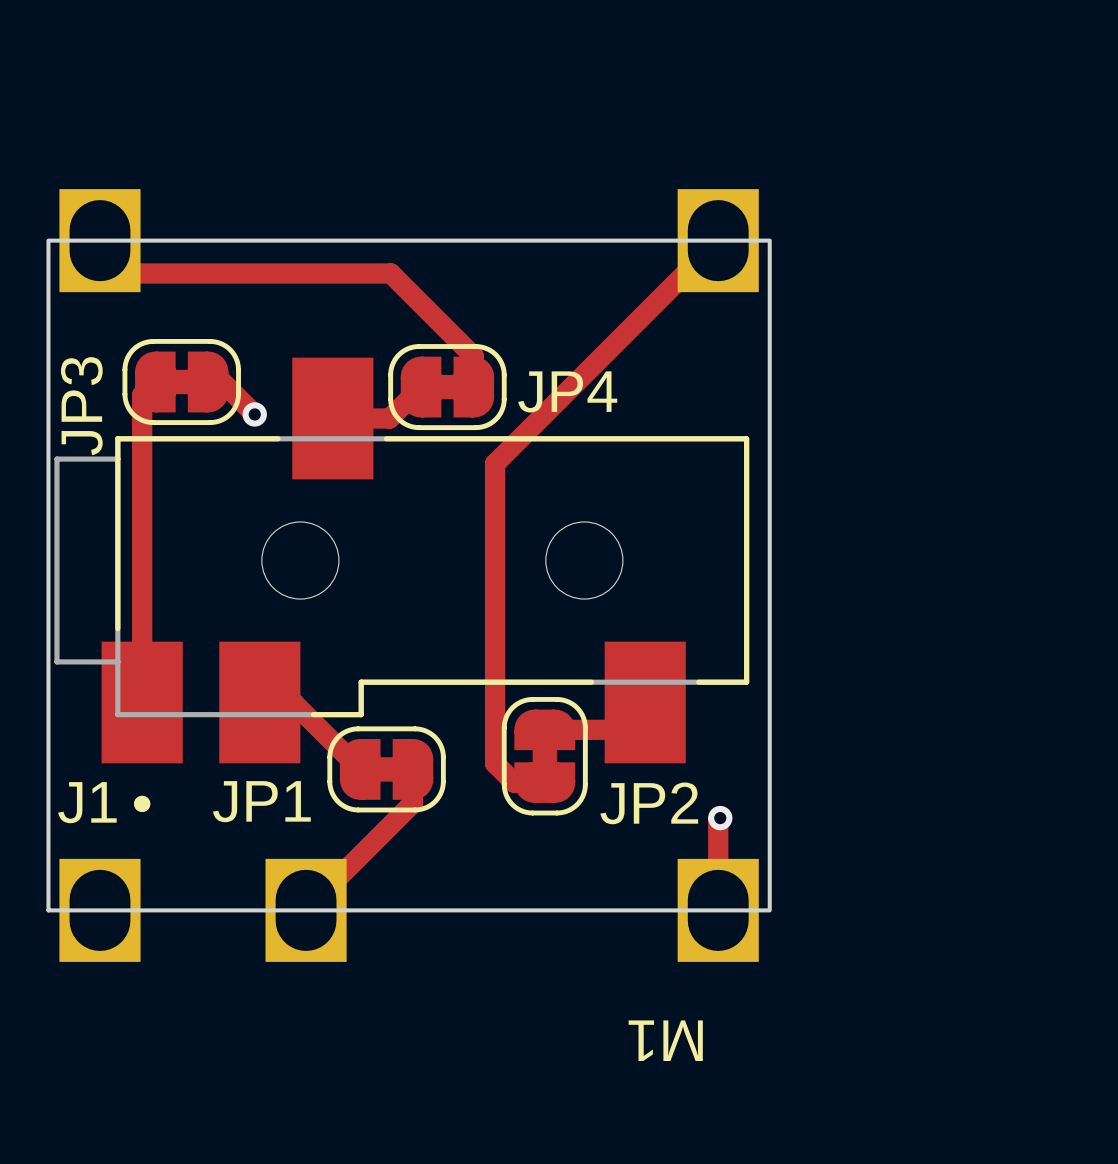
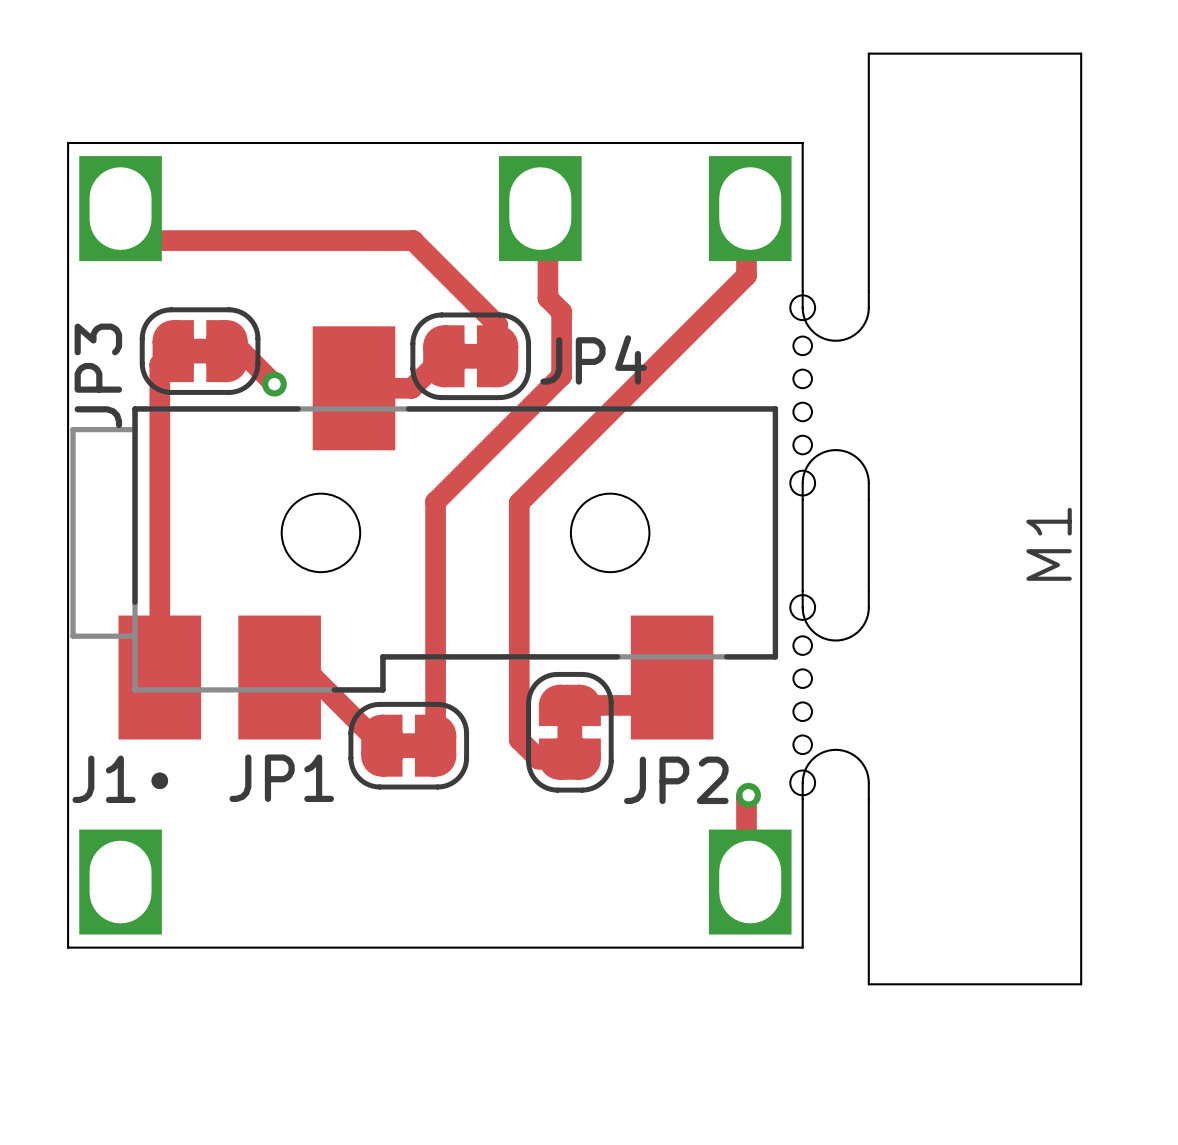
M1 footprint: [46, 189, 772, 962] -> [67, 141, 870, 949]
top track: (718, 240) (495, 463) (495, 531) -> (746, 207) (746, 275) (519, 502)
board edge: none -> (868, 291) (868, 53) (1081, 53) (1081, 984) (868, 984) (868, 799)
board edge: none -> (868, 499) (868, 590)
top track: (412, 769) (412, 803) (303, 912) (303, 909) (316, 896) -> (435, 745) (435, 501) (561, 375) (561, 311) (547, 298) (547, 208)
M1 name position: M1 (665, 1040) -> M1 (1049, 544)

